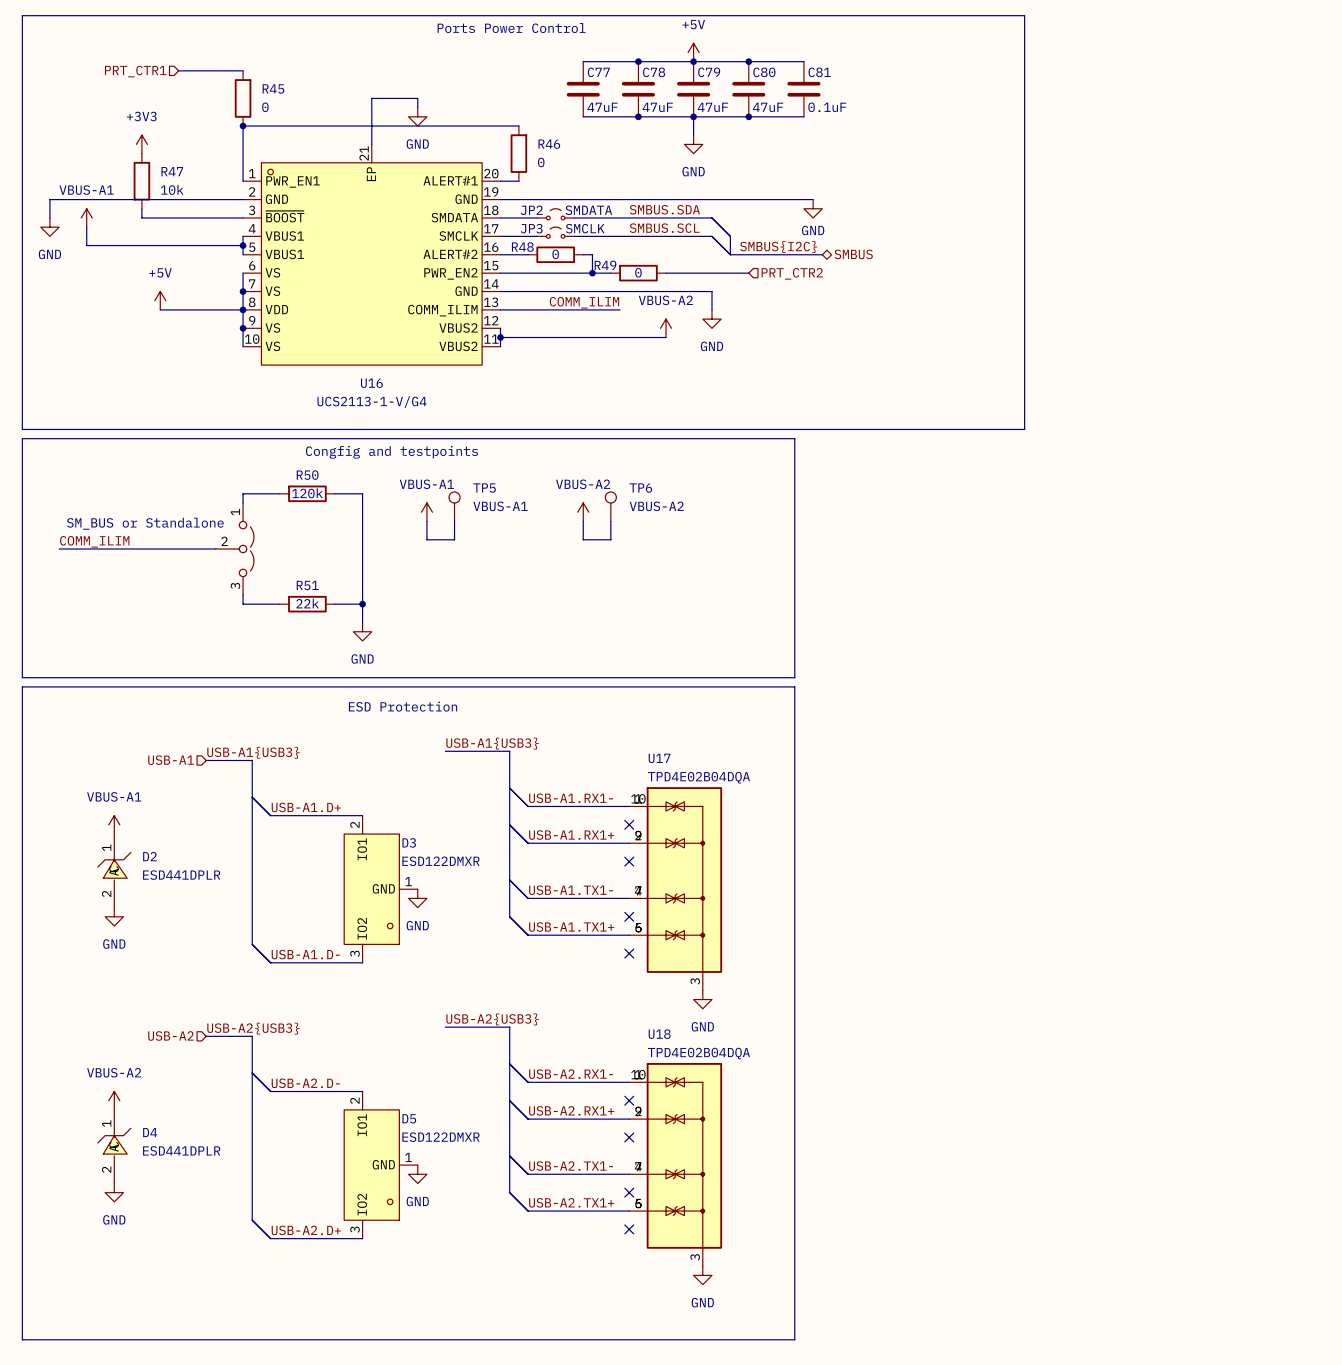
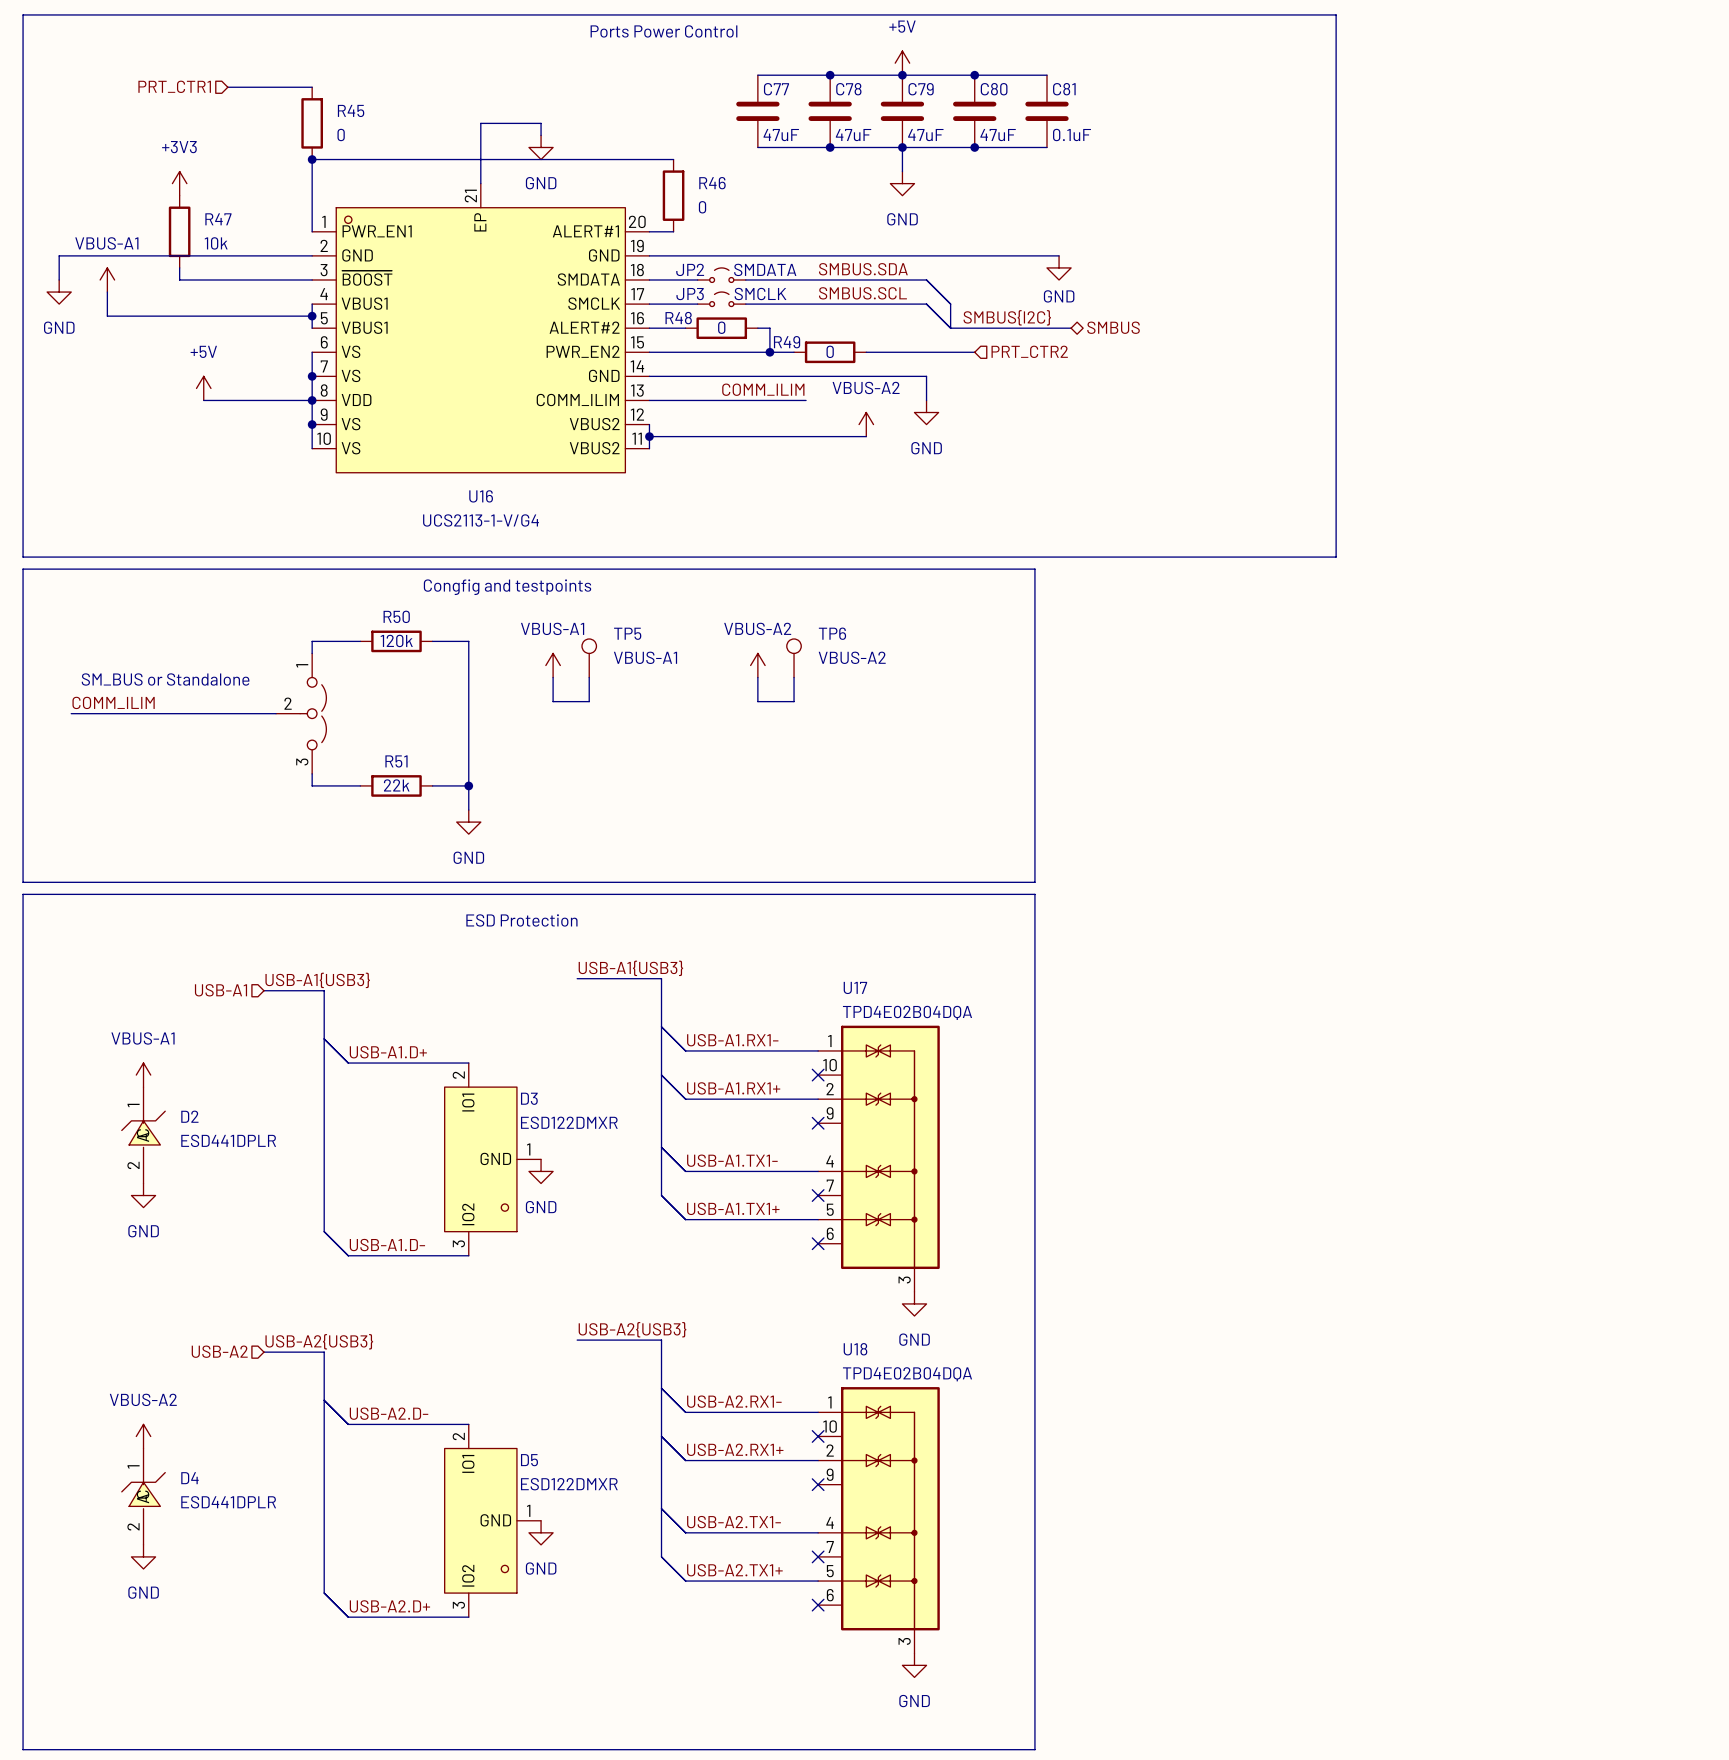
U17 symbol: [629, 787, 723, 991] -> [818, 1025, 940, 1292]
U18 symbol: [629, 1063, 723, 1267] -> [818, 1387, 940, 1654]

